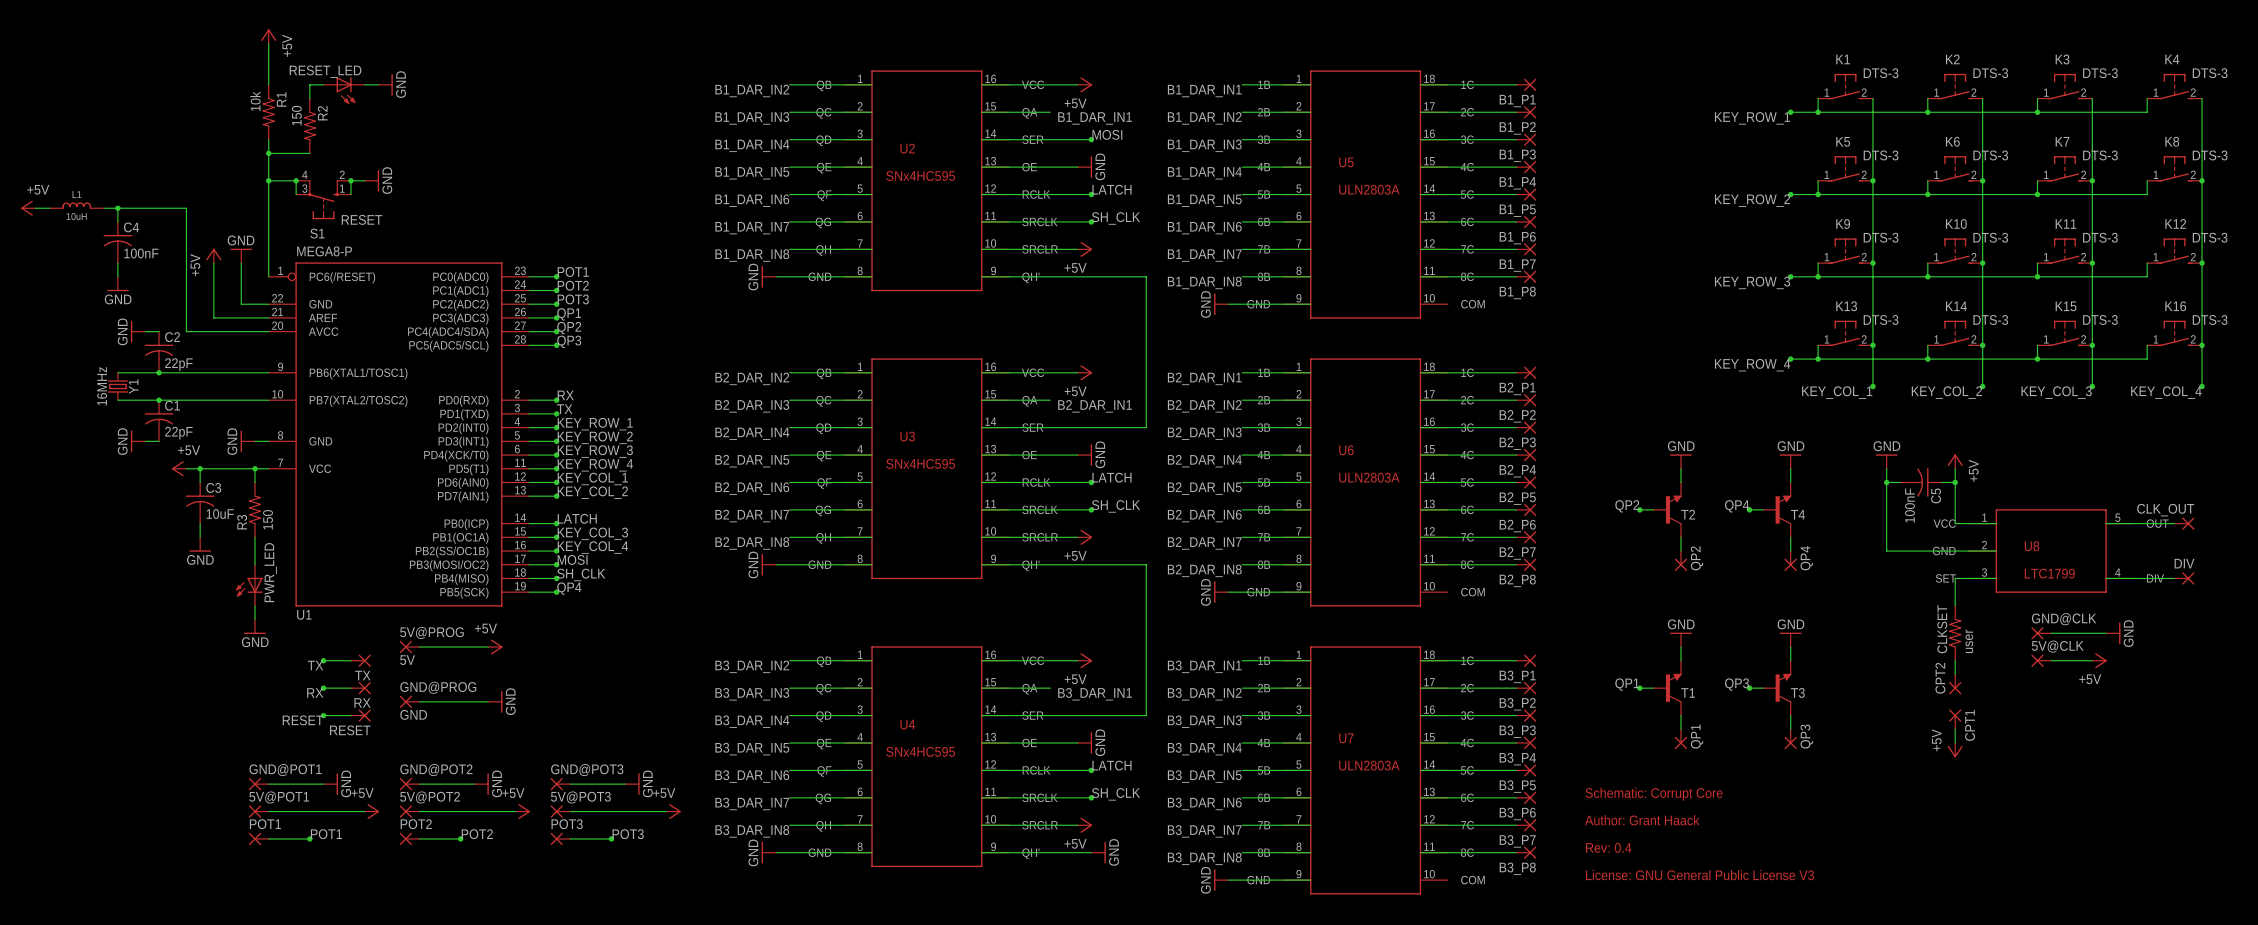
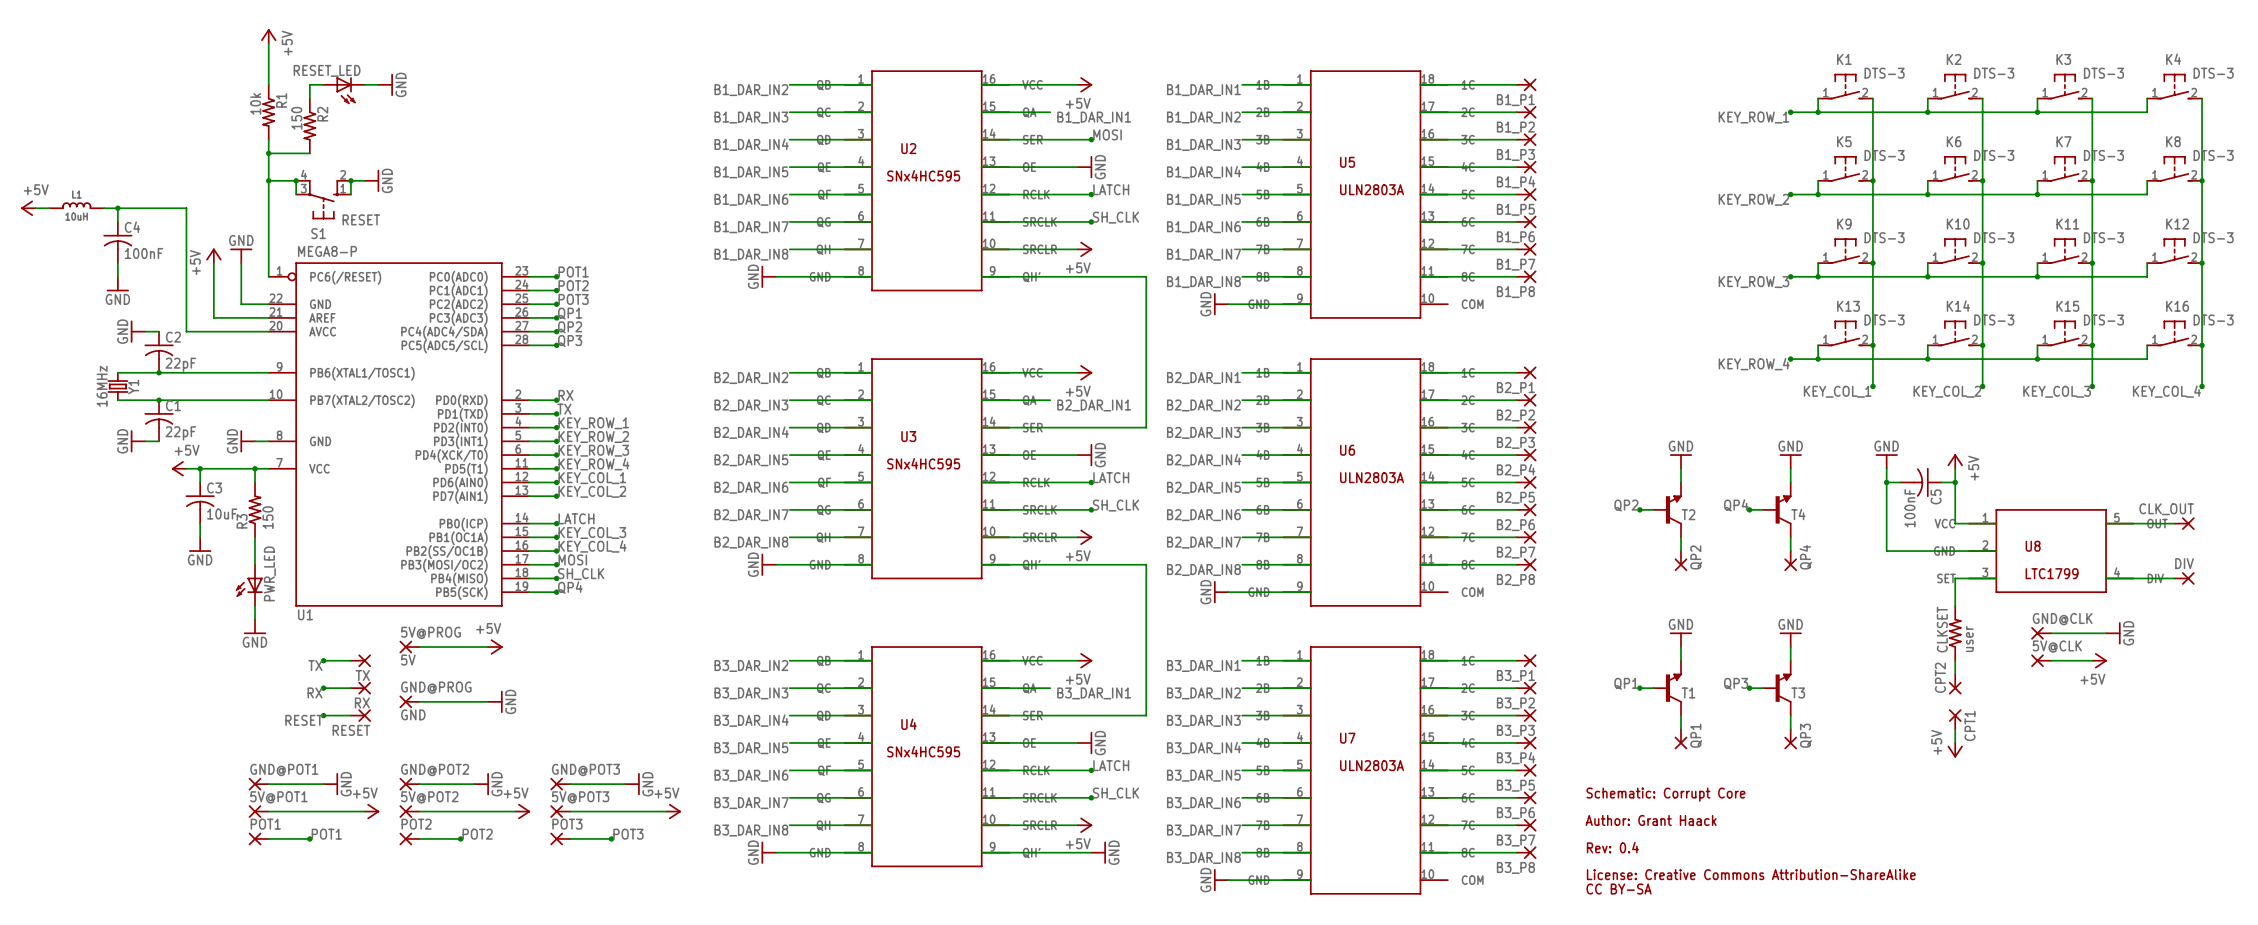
text: License: GNU General Public License V3 (1700, 875) -> License: Creative Commons Attribution-ShareAlike (1751, 874)
text: none -> CC BY-SA (1619, 889)

